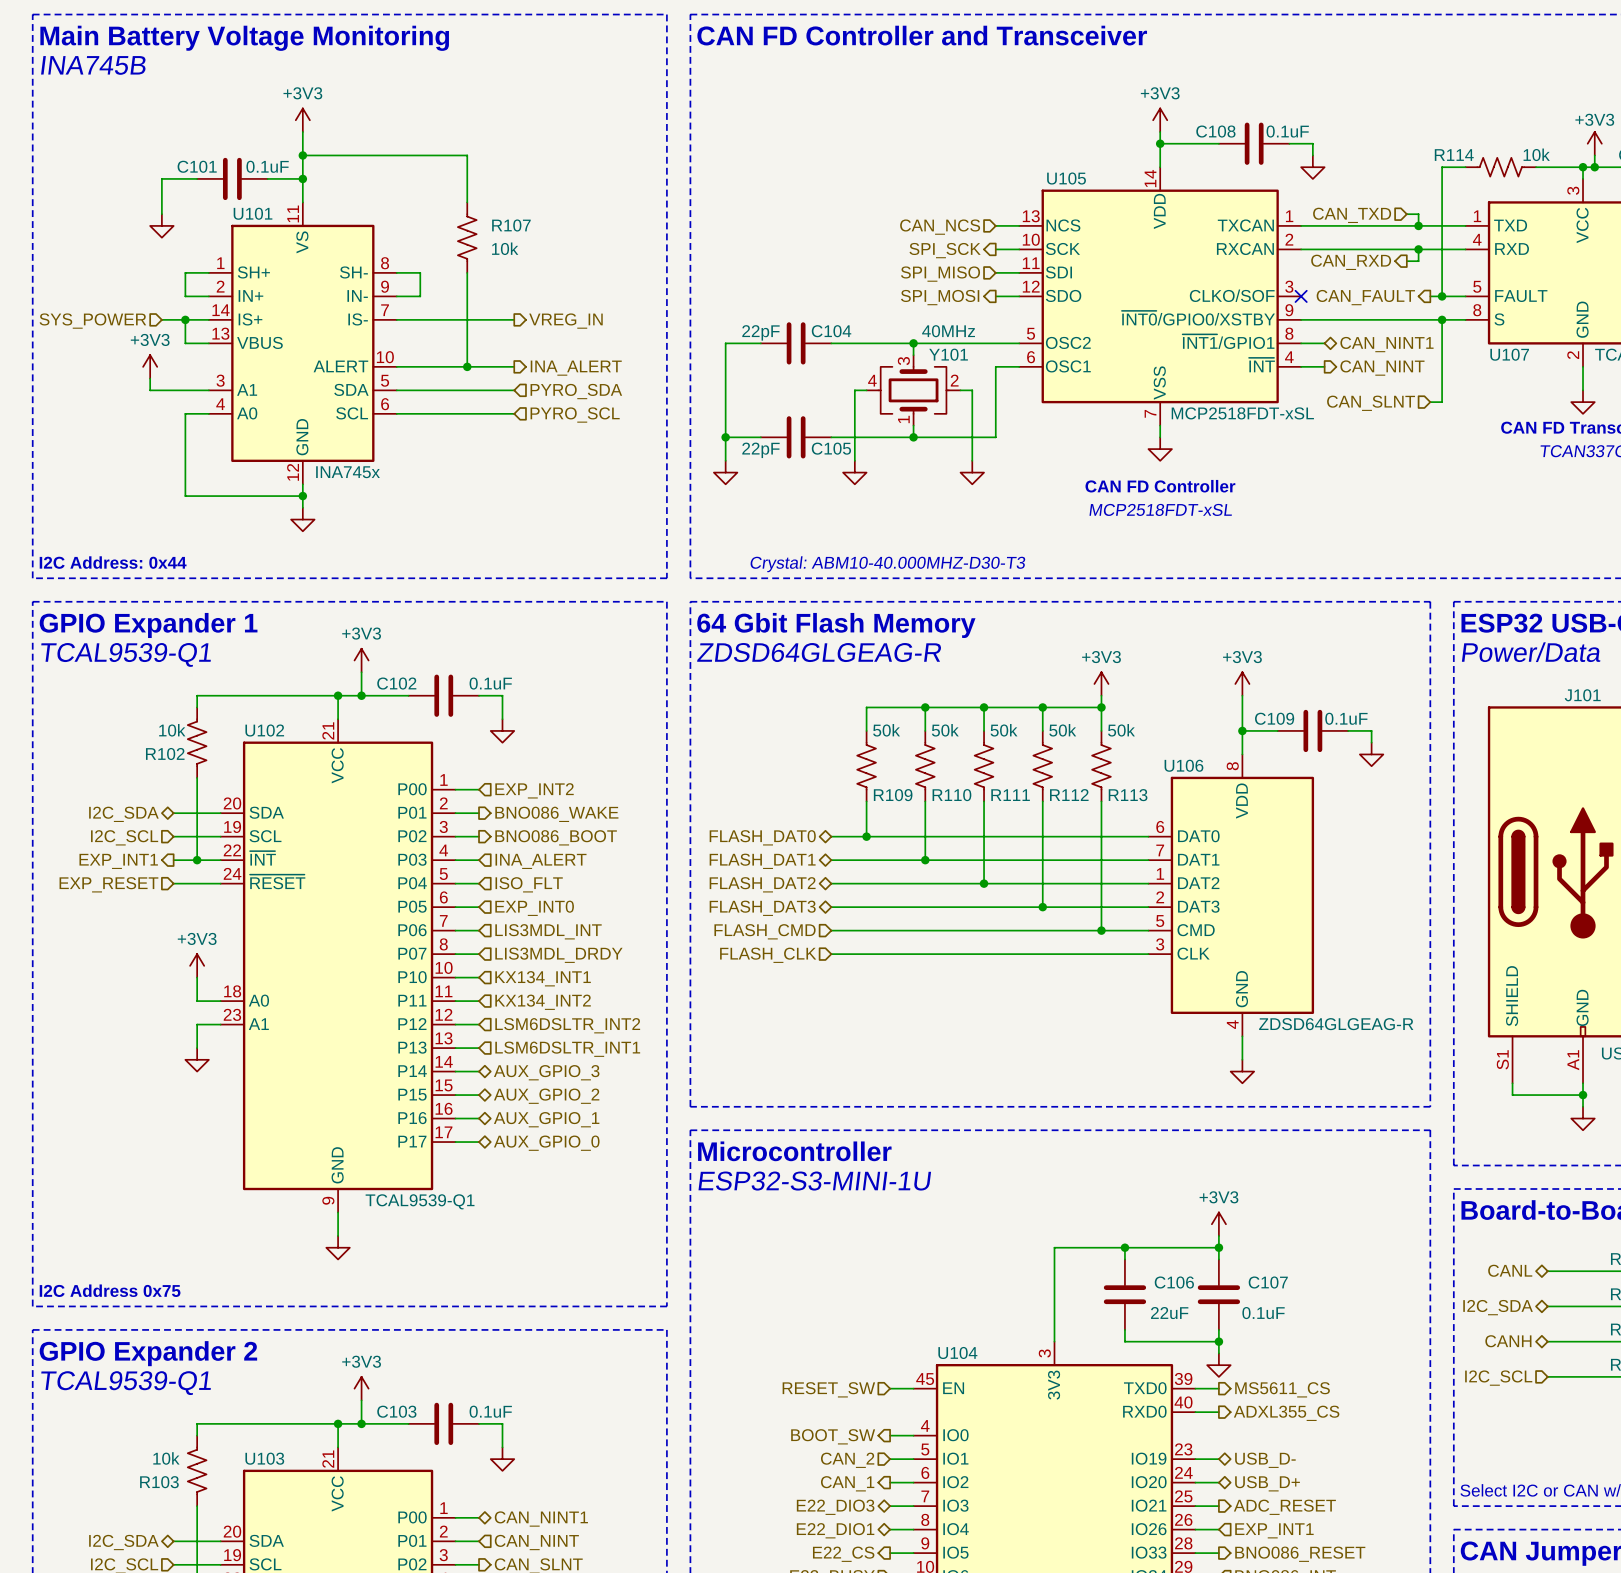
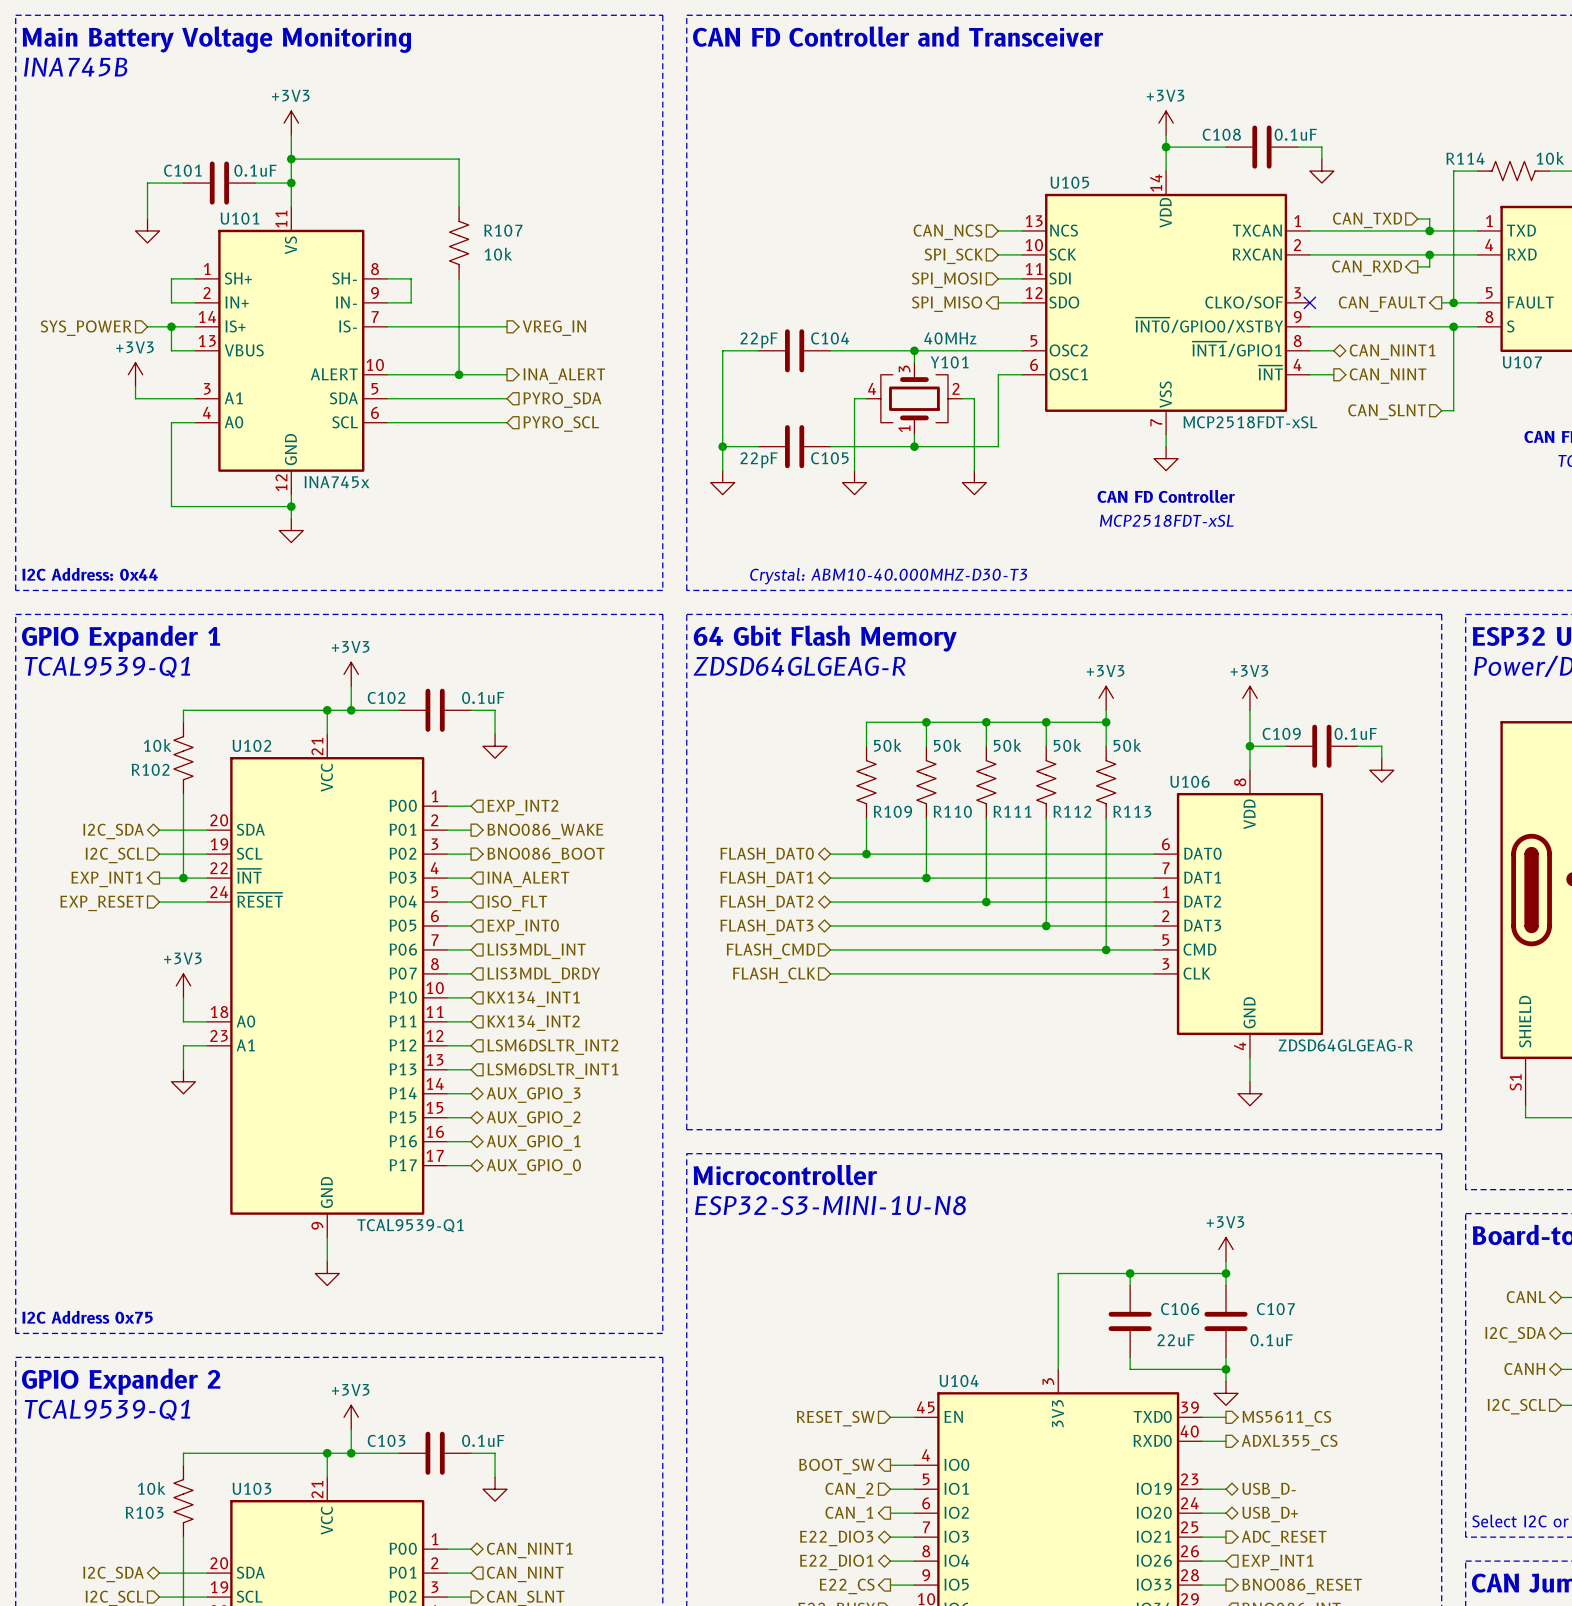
hierarchical label shape: output (945, 250) -> input (953, 256)
hierarchical label: SPI_MISO (940, 274) -> SPI_MOSI (946, 280)
hierarchical label: SPI_MOSI (940, 297) -> SPI_MISO (947, 304)
text: ESP32-S3-MINI-1U (814, 1181) -> ESP32-S3-MINI-1U-N8 (830, 1205)

